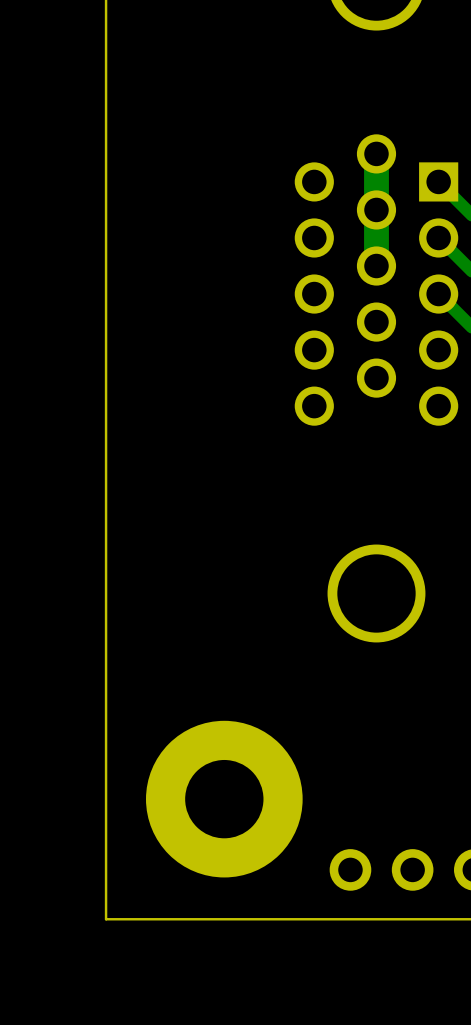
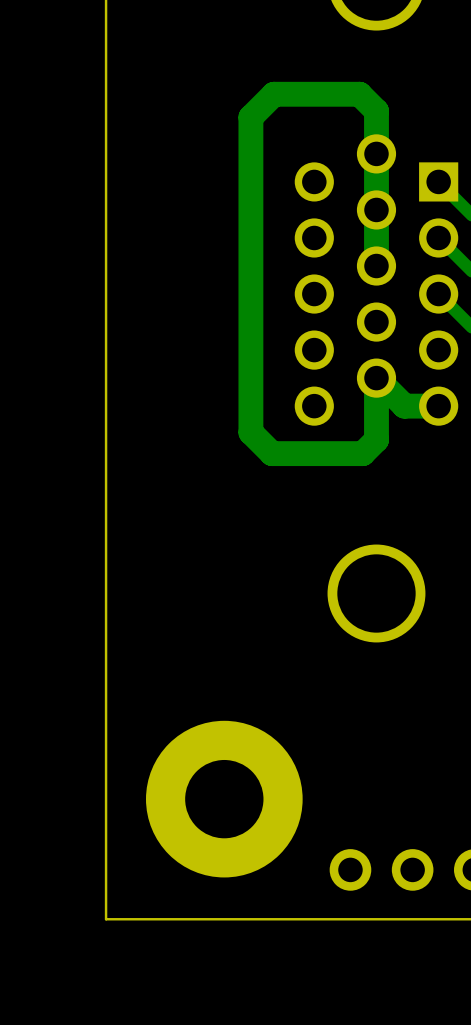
track: none -> (376, 153) (376, 111) (359, 94) (273, 94) (250, 117) (250, 432) (272, 453) (362, 453) (376, 439) (376, 378) (404, 406) (438, 406)

